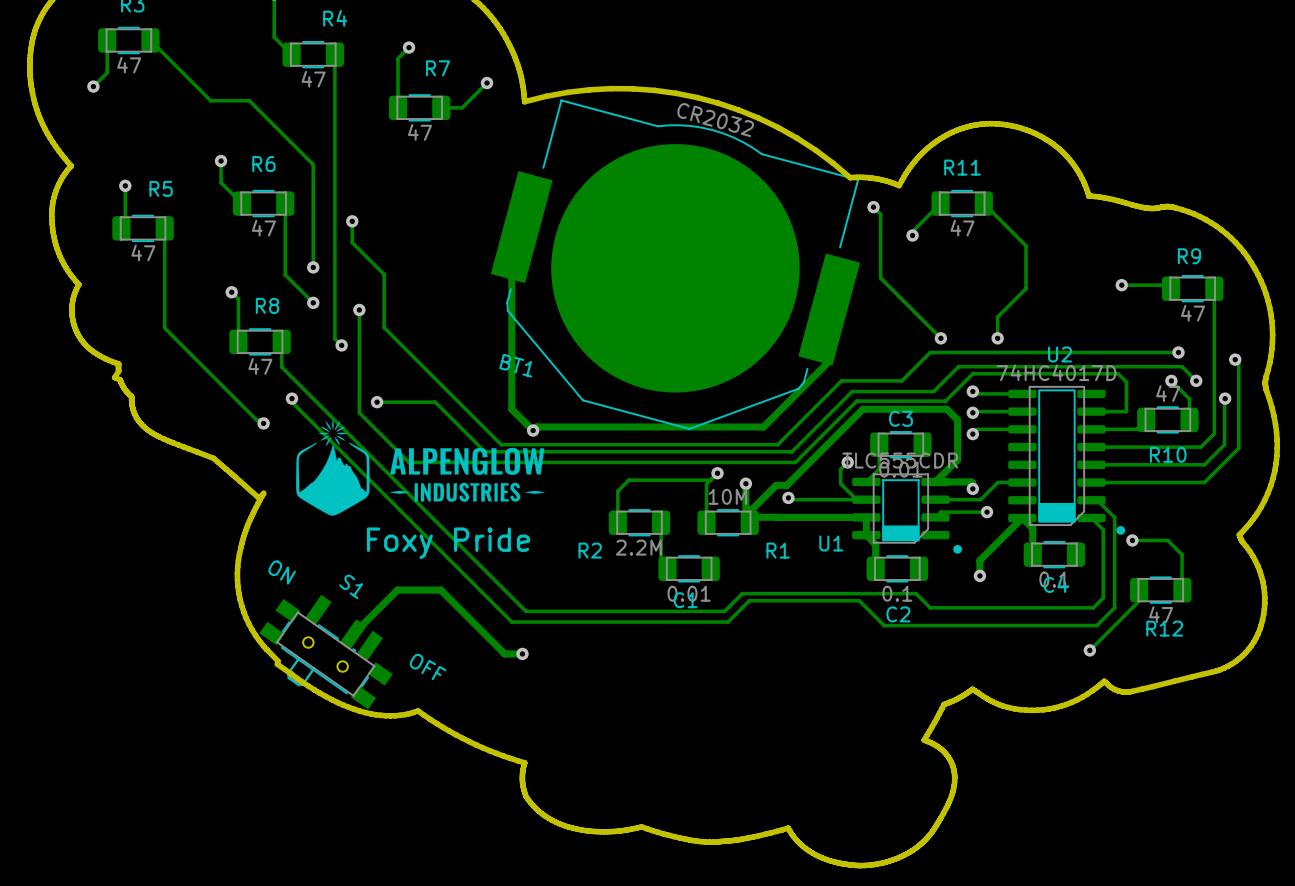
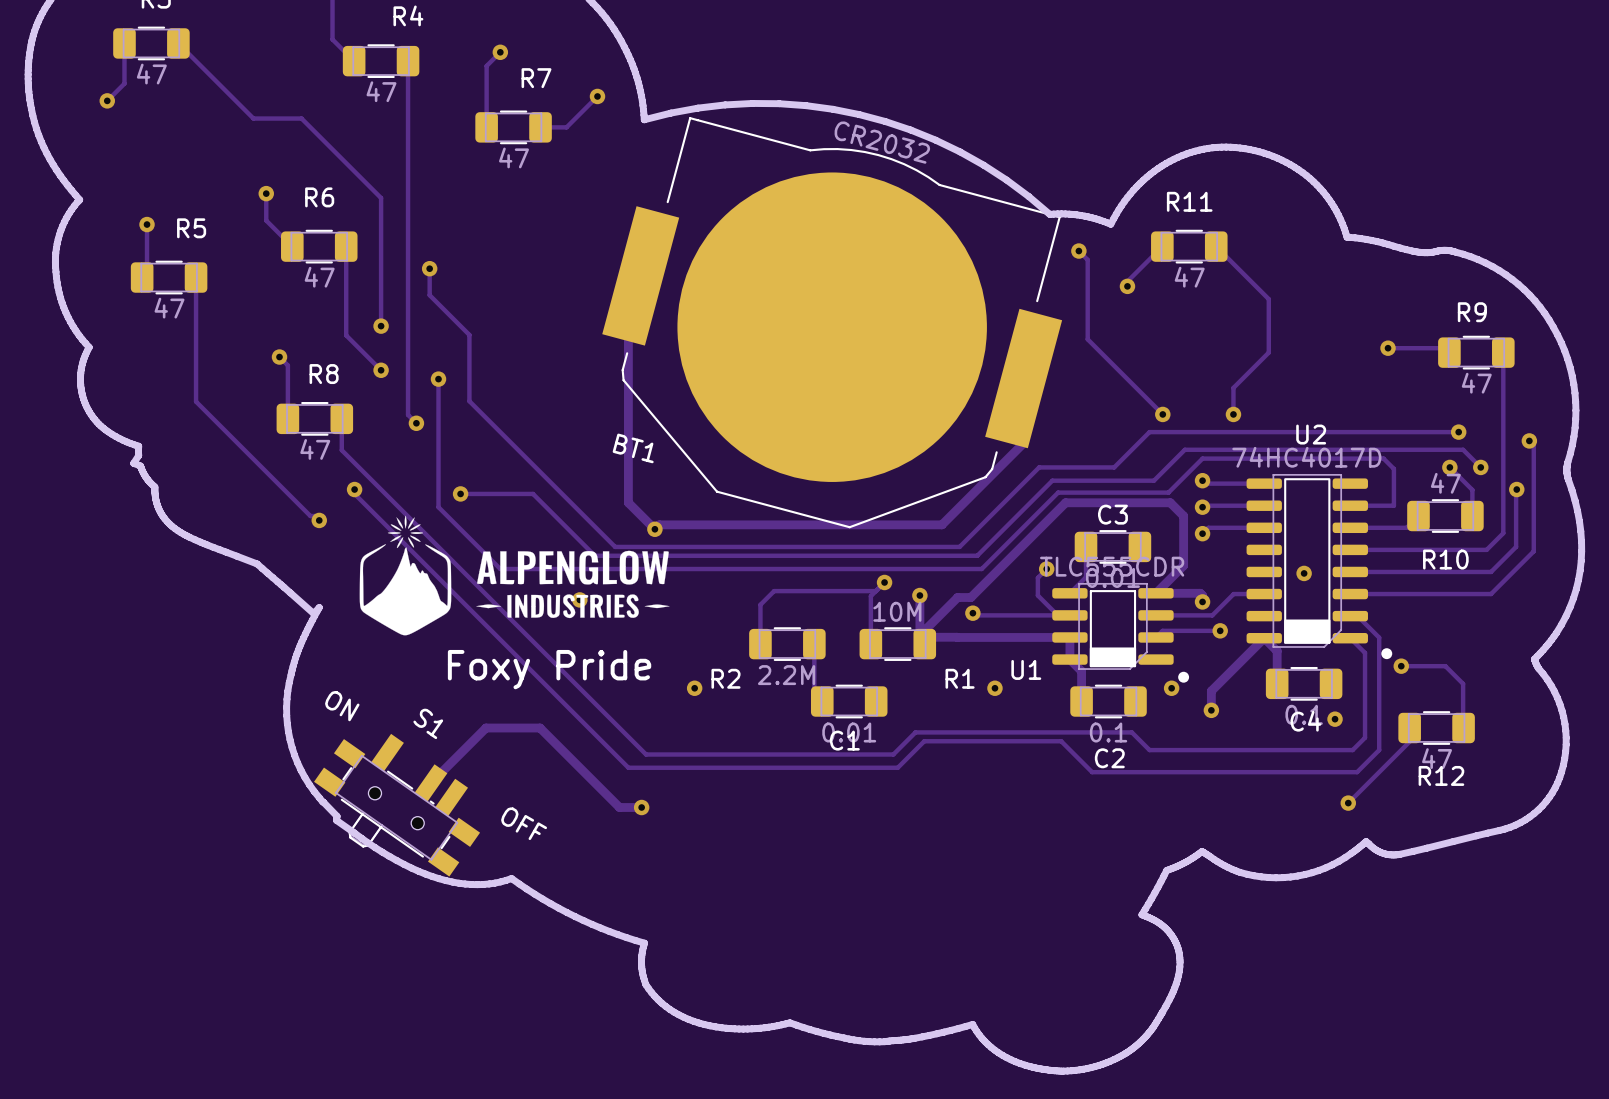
via: none -> (1304, 573)
via: none -> (579, 599)
via: none -> (694, 688)
via: none -> (994, 688)
via: none -> (1171, 688)
via: none -> (1335, 719)

